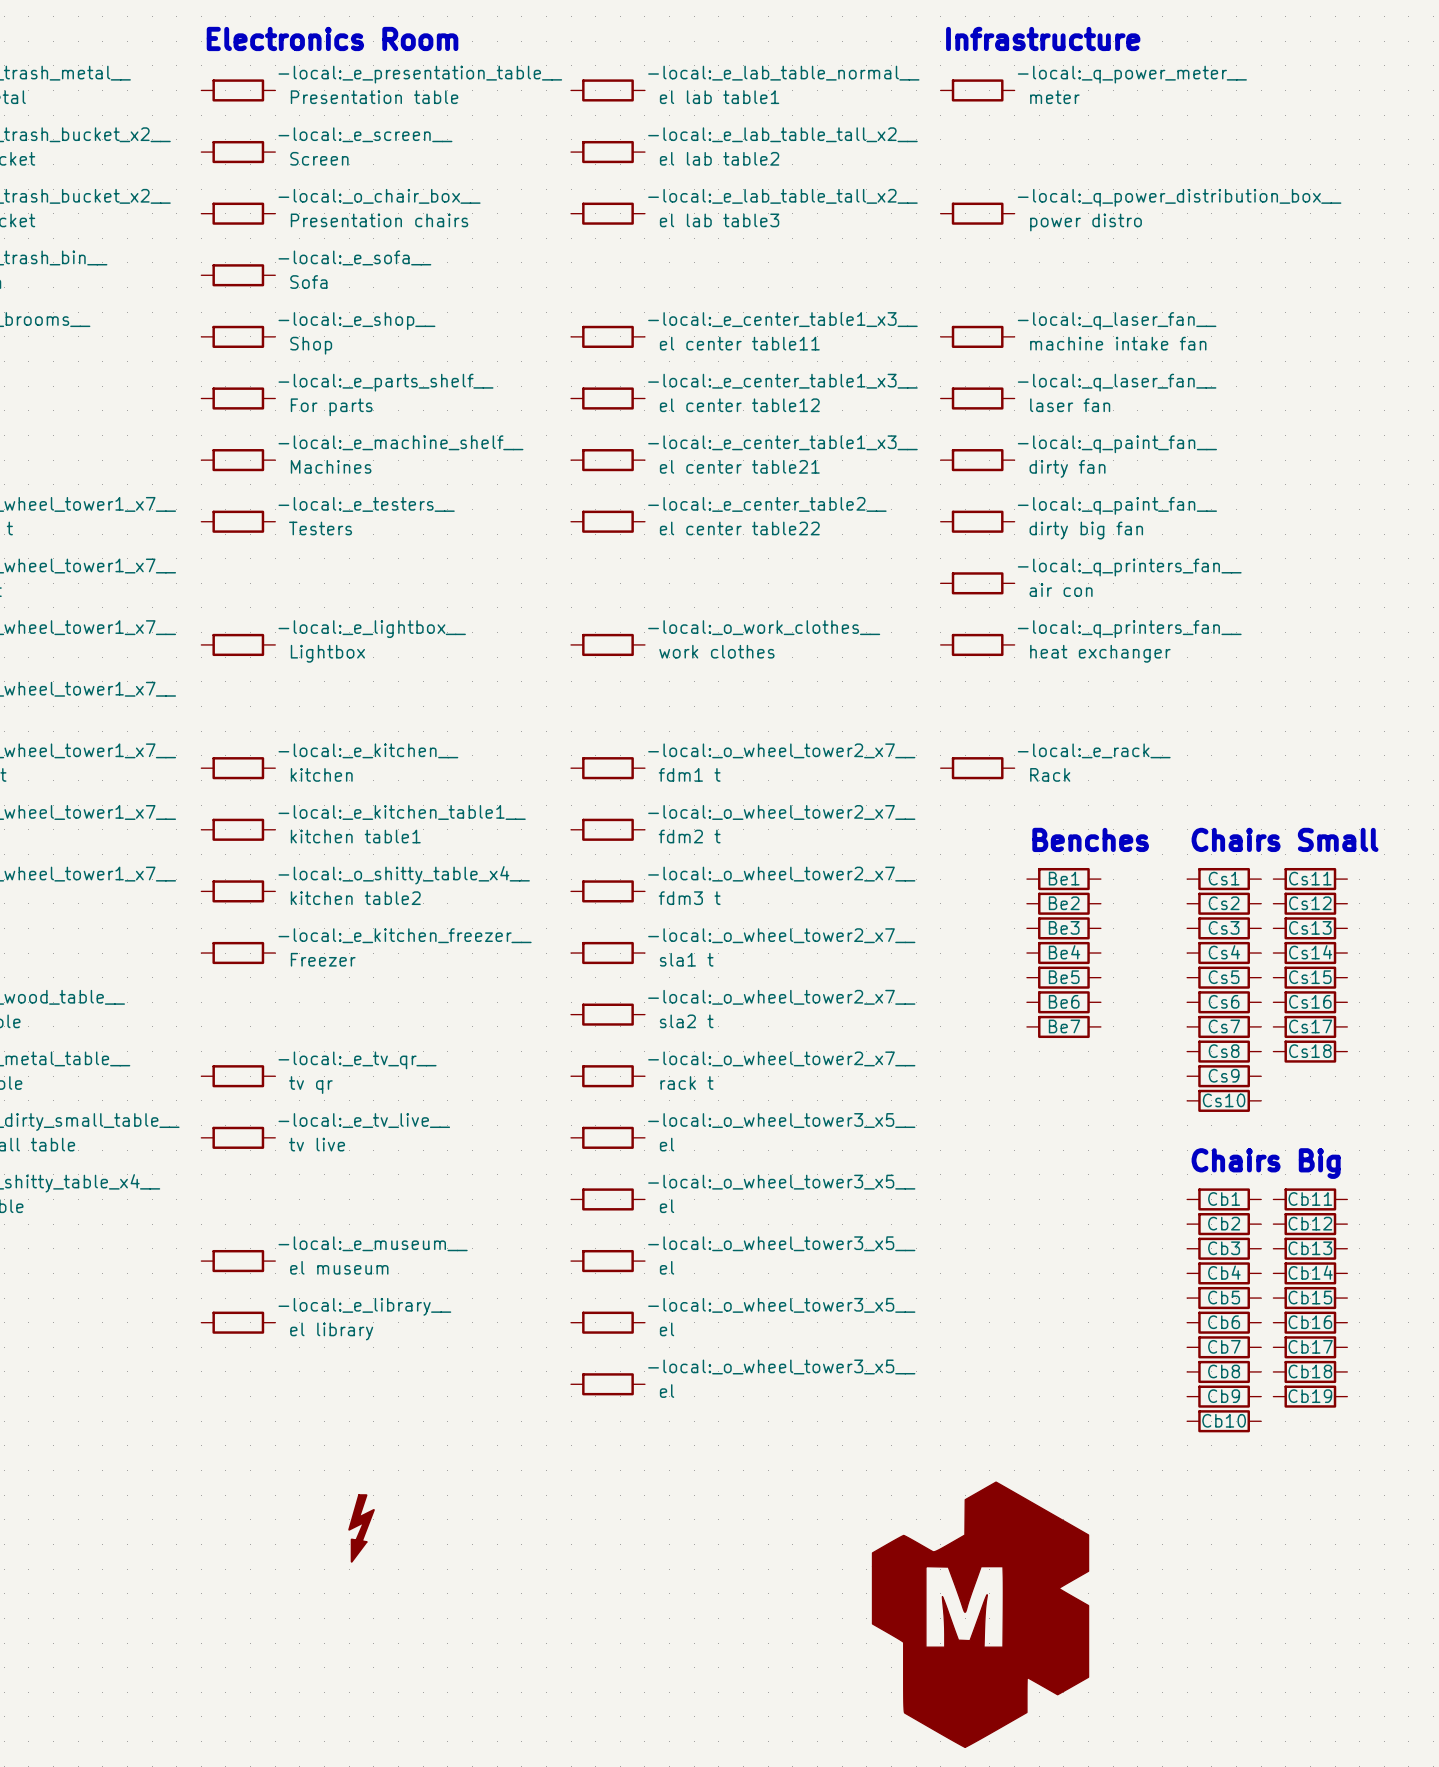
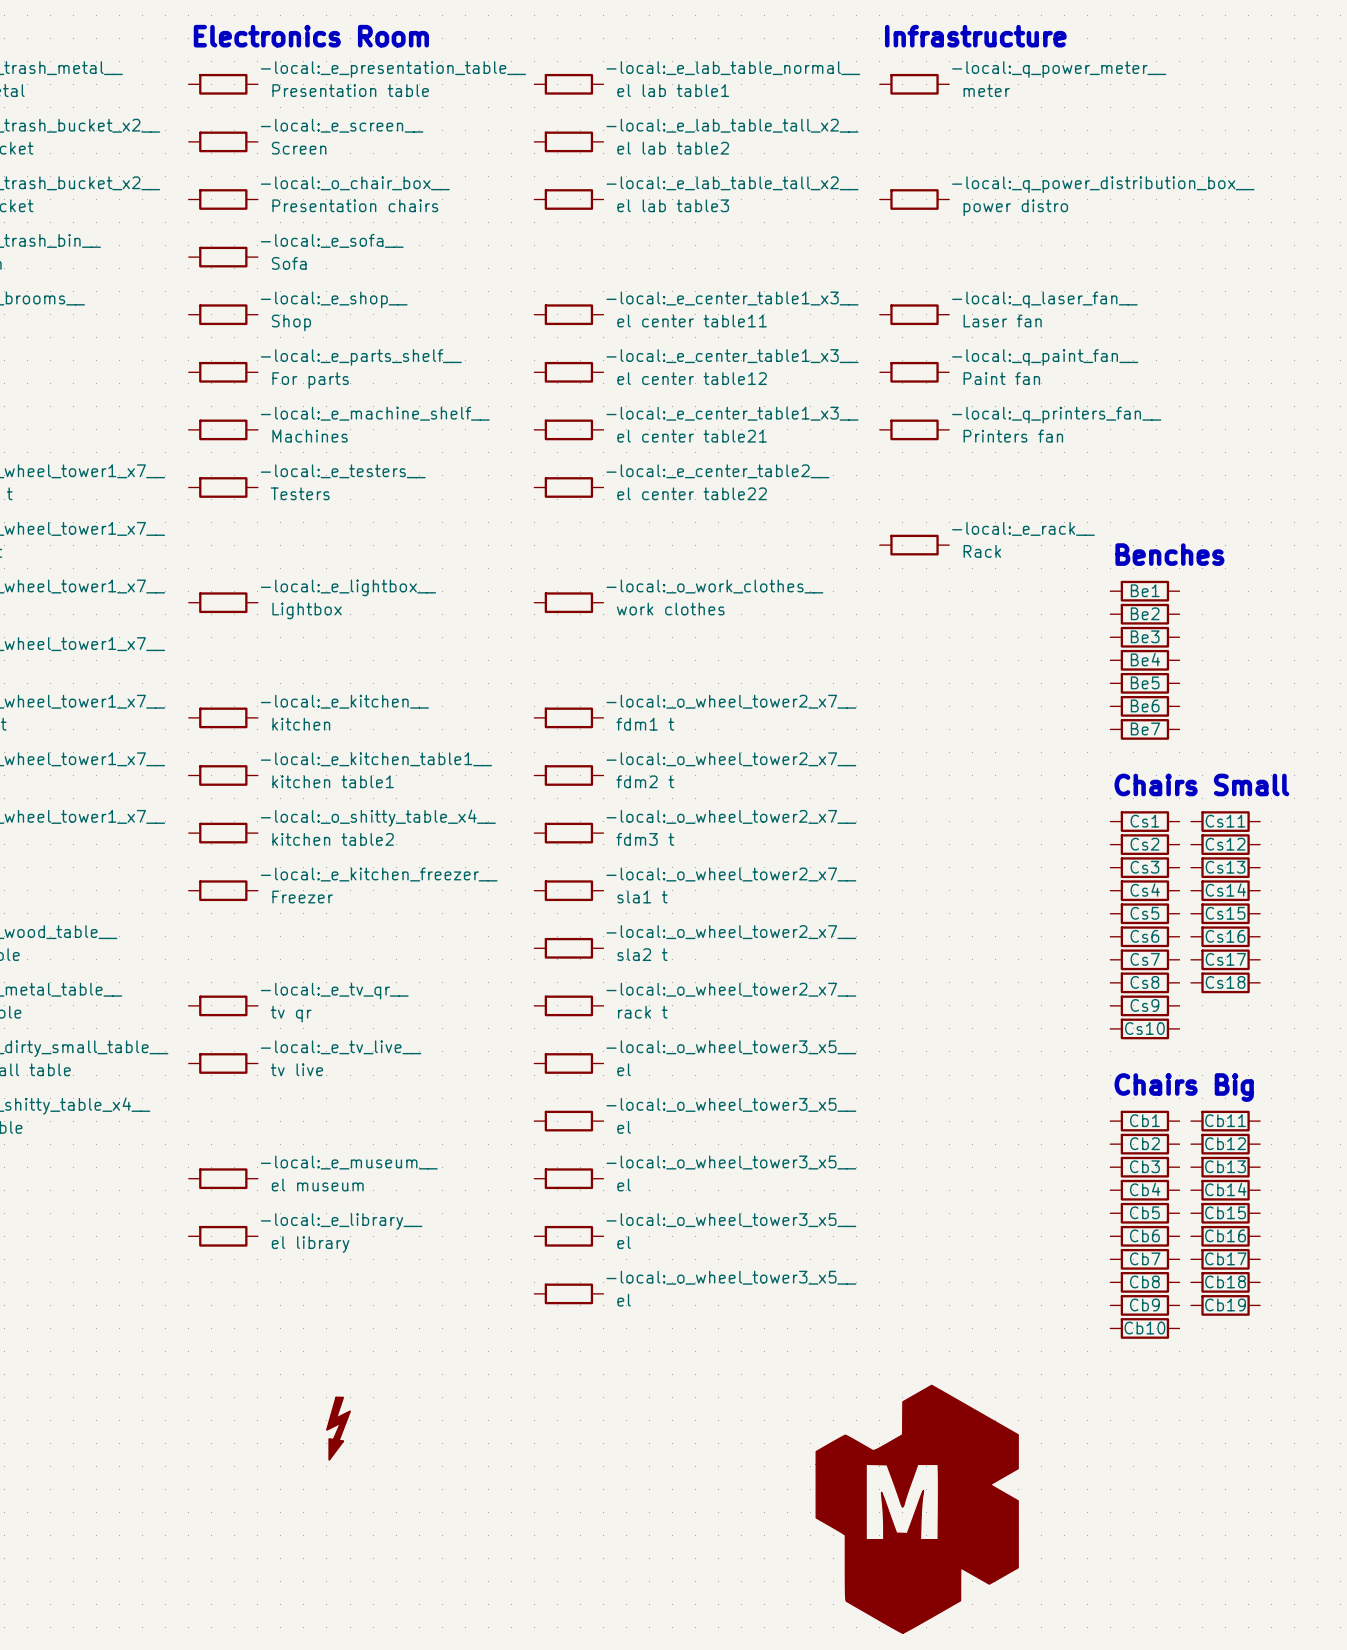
part value: machine intake fan (1118, 343) -> Laser fan (1002, 321)
part text: -local:_q_laser_fan__ (1117, 382) -> -local:_q_paint_fan__ (1045, 357)
part value: laser fan (1070, 405) -> Paint fan (1001, 378)
part text: -local:_q_paint_fan__ (1117, 444) -> -local:_q_printers_fan__ (1056, 415)
part value: dirty fan (1067, 468) -> Printers fan (1013, 436)
part: dirty big fan (977, 521) -> none
part text: -local:_q_printers_fan__ (1129, 567) -> -local:_e_rack__ (1023, 528)
part value: air con (1061, 590) -> Rack (982, 551)
text: none -> Benches (1169, 554)
part: heat exchanger (977, 644) -> none
part: Rack (977, 768) -> none
text: Benches (1090, 839) -> none
Be1 position: (1063, 879) -> (1144, 591)
Be2 position: (1063, 903) -> (1144, 614)
Be3 position: (1063, 928) -> (1144, 637)
Be4 position: (1063, 953) -> (1144, 660)
Be5 position: (1063, 977) -> (1144, 683)
Be6 position: (1063, 1002) -> (1144, 706)
Be7 position: (1063, 1026) -> (1144, 729)

